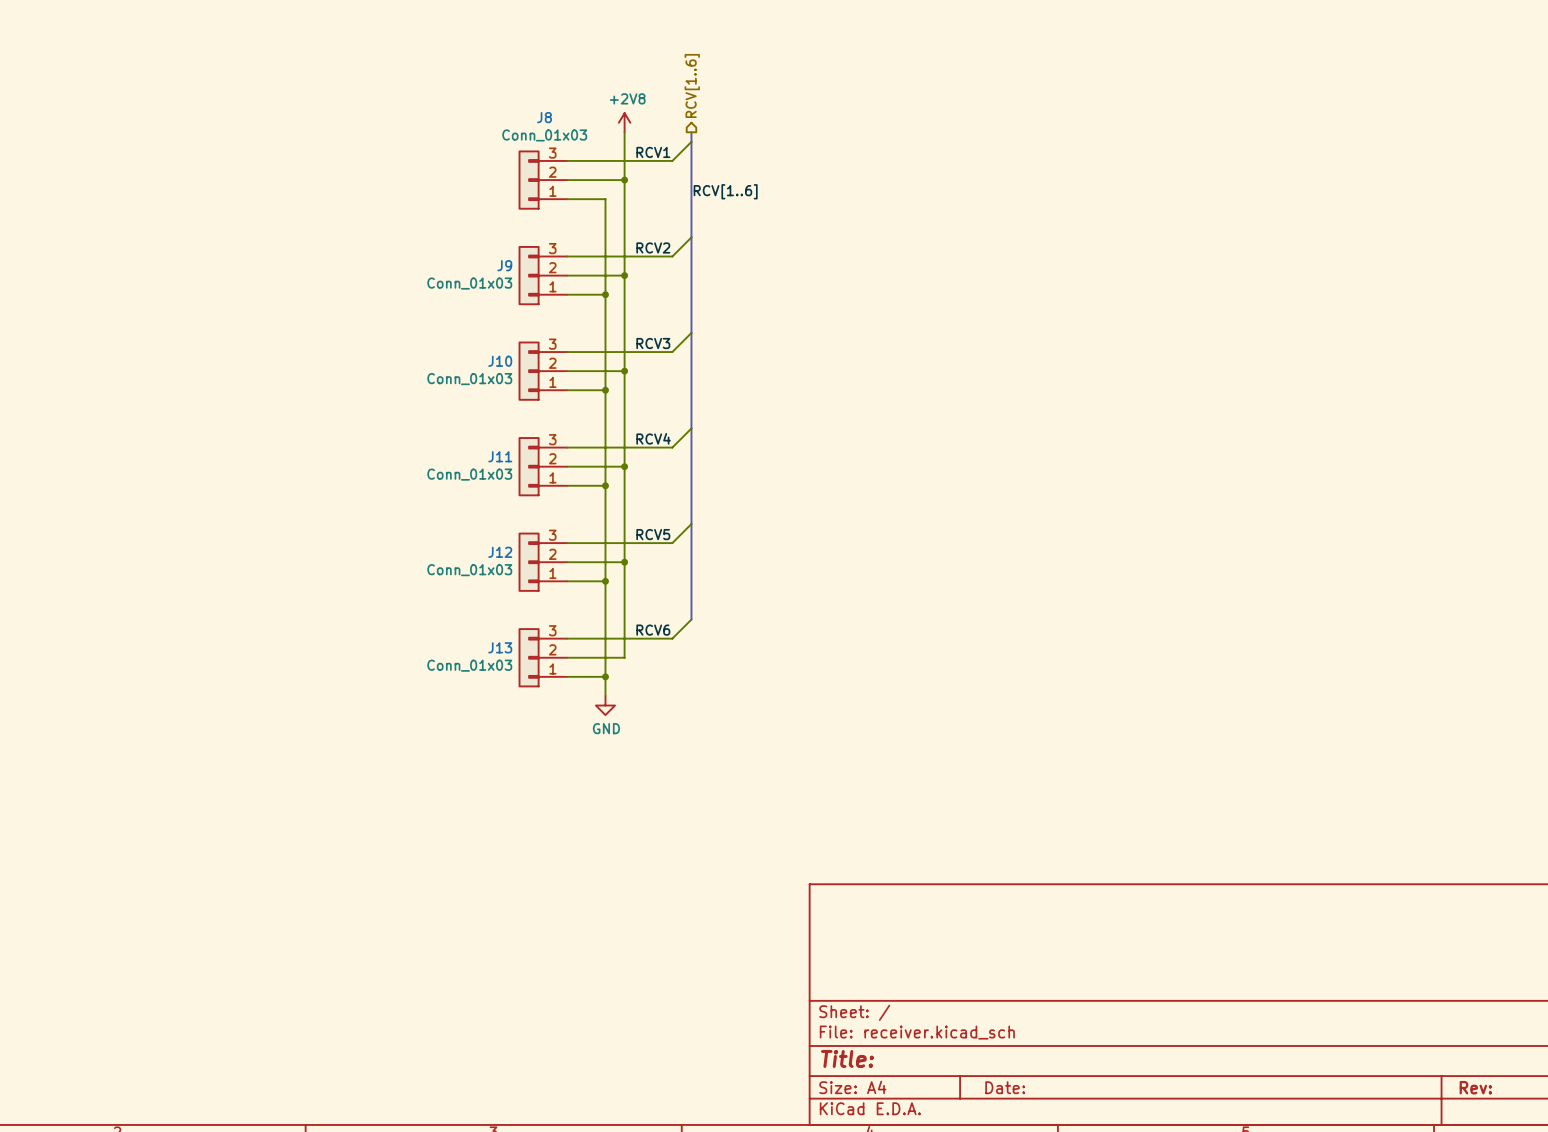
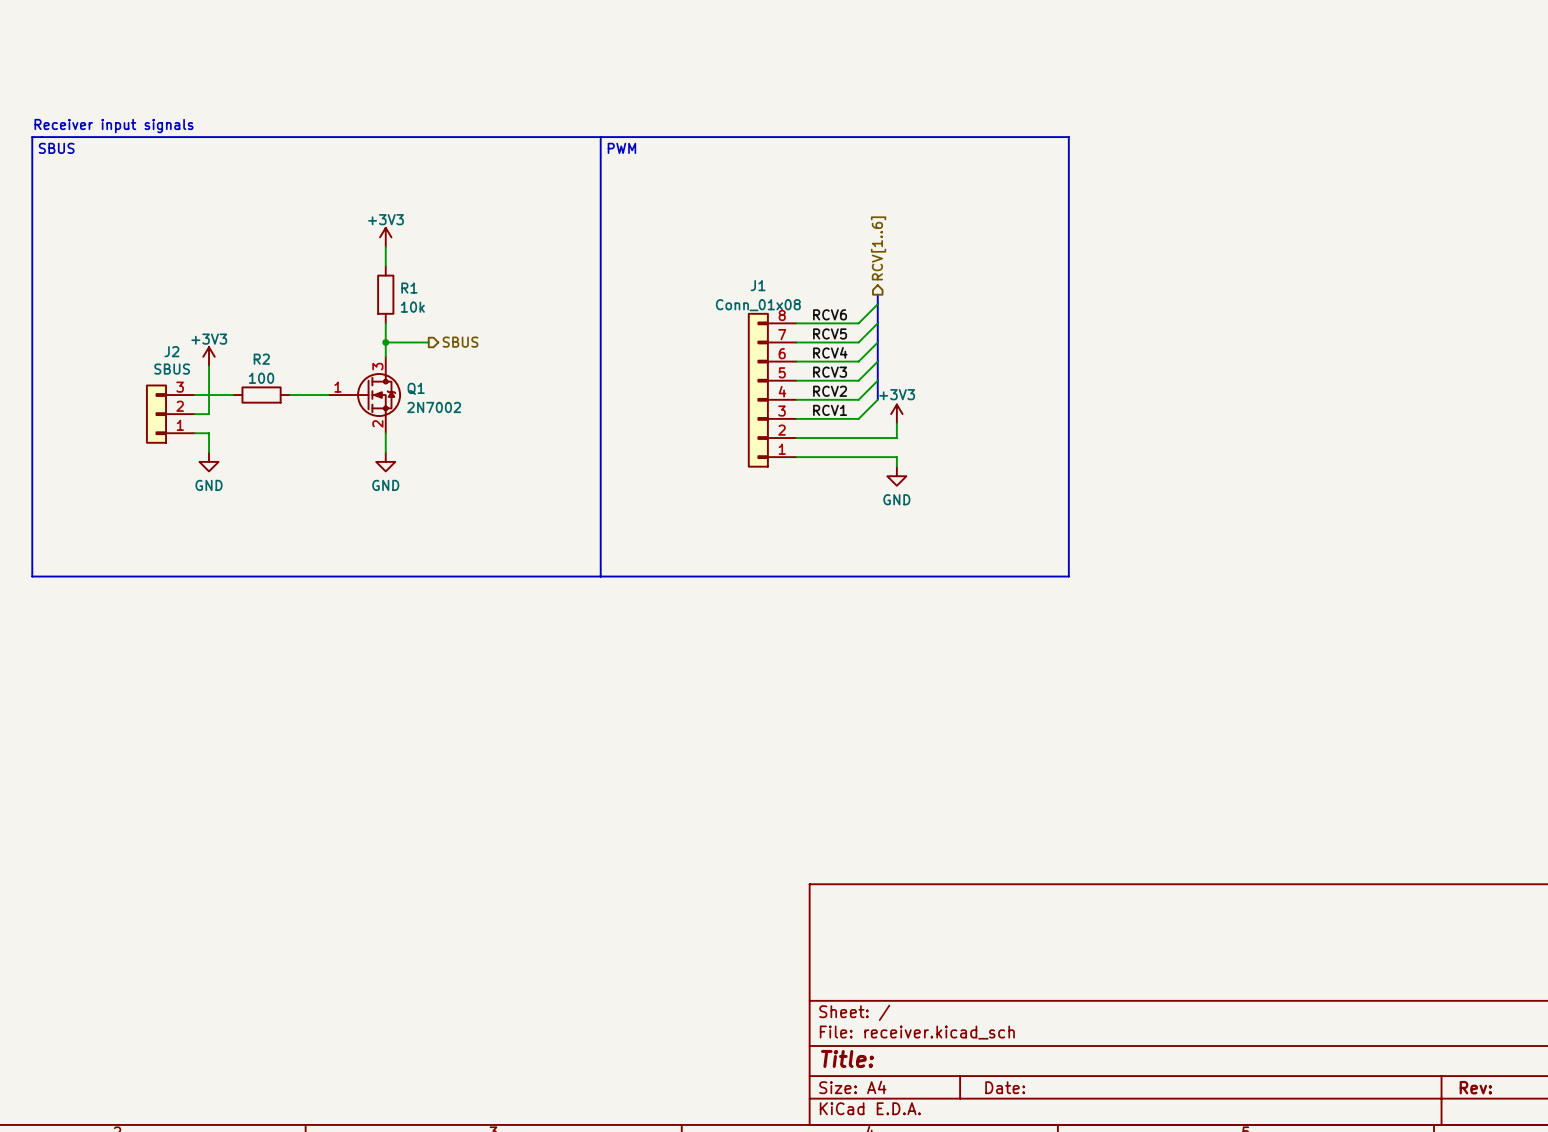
hierarchical label: RCV[1..6] (692, 85) -> none
power symbol: +2V8 (624, 122) -> none
text: none -> Receiver input signals (114, 126)
wire: (624, 132) (624, 657) (567, 657) -> none
bus: (691, 132) (691, 619) -> none
line: none -> (32, 137) (1068, 137) (1068, 576) (32, 576) (32, 137)
line: none -> (600, 137) (600, 576)
wire: (691, 141) (672, 160) (567, 160) -> none
text: none -> SBUS (56, 148)
text: none -> PWM (621, 148)
label: RCV1 (653, 152) -> none
J8: Conn_01x03 (542, 180) -> none
wire: (567, 180) (624, 180) -> none
junction: (624, 180) -> none
label: RCV[1..6] (725, 191) -> none
wire: (567, 199) (605, 199) (605, 695) -> none
power symbol: none -> +3V3 (385, 237)
wire: (691, 237) (672, 256) (567, 256) -> none
wire: none -> (385, 246) (385, 266)
label: RCV2 (653, 247) -> none
hierarchical label: none -> RCV[1..6] (878, 248)
J9: Conn_01x03 (542, 275) -> none
wire: (567, 275) (624, 275) -> none
junction: (624, 275) -> none
R1: none -> 10k (385, 294)
wire: (567, 294) (605, 294) -> none
junction: (605, 294) -> none
bus: none -> (877, 294) (877, 399)
wire: none -> (877, 304) (858, 323) (796, 323)
label: none -> RCV6 (830, 314)
wire: none -> (385, 323) (385, 356)
wire: none -> (877, 323) (858, 342) (796, 342)
wire: (691, 332) (672, 352) (567, 352) -> none
label: none -> RCV5 (830, 333)
wire: none -> (385, 342) (428, 342)
junction: none -> (385, 342)
hierarchical label: none -> SBUS (460, 342)
wire: none -> (877, 342) (858, 361) (796, 361)
label position: RCV3 (653, 343) -> RCV3 (830, 372)
label: none -> RCV4 (830, 352)
power symbol: none -> +3V3 (209, 356)
wire: none -> (877, 361) (858, 380) (796, 380)
wire: none -> (209, 366) (209, 414) (194, 414)
J10: Conn_01x03 (542, 371) -> none
wire: (567, 371) (624, 371) -> none
junction: (624, 371) -> none
wire: none -> (877, 380) (858, 399) (796, 399)
wire: (567, 390) (605, 390) -> none
junction: (605, 390) -> none
J1: none -> Conn_01x08 (772, 390)
label: none -> RCV2 (830, 391)
wire: none -> (194, 395) (232, 395)
R2: none -> 100 (261, 395)
wire: none -> (290, 395) (328, 395)
Q1: none -> 2N7002 (364, 395)
wire: none -> (877, 399) (858, 418) (796, 418)
label: none -> RCV1 (830, 410)
J2: none -> SBUS (170, 414)
power symbol: none -> +3V3 (896, 414)
wire: none -> (896, 423) (896, 438) (796, 438)
wire: (691, 428) (672, 447) (567, 447) -> none
wire: none -> (194, 433) (209, 433) (209, 452)
wire: none -> (385, 433) (385, 452)
label: RCV4 (653, 438) -> none
wire: none -> (796, 457) (896, 457) (896, 466)
power symbol: none -> GND (209, 461)
power symbol: none -> GND (385, 461)
J11: Conn_01x03 (542, 466) -> none
wire: (567, 466) (624, 466) -> none
junction: (624, 466) -> none
power symbol: none -> GND (896, 476)
wire: (567, 485) (605, 485) -> none
junction: (605, 485) -> none
wire: (691, 524) (672, 543) (567, 543) -> none
label: RCV5 (653, 534) -> none
J12: Conn_01x03 (542, 562) -> none
wire: (567, 562) (624, 562) -> none
junction: (624, 562) -> none
wire: (567, 581) (605, 581) -> none
junction: (605, 581) -> none
wire: (691, 619) (672, 638) (567, 638) -> none
label: RCV6 (653, 630) -> none
J13: Conn_01x03 (542, 657) -> none
wire: (567, 676) (605, 676) -> none
junction: (605, 676) -> none
power symbol: GND (605, 705) -> none

